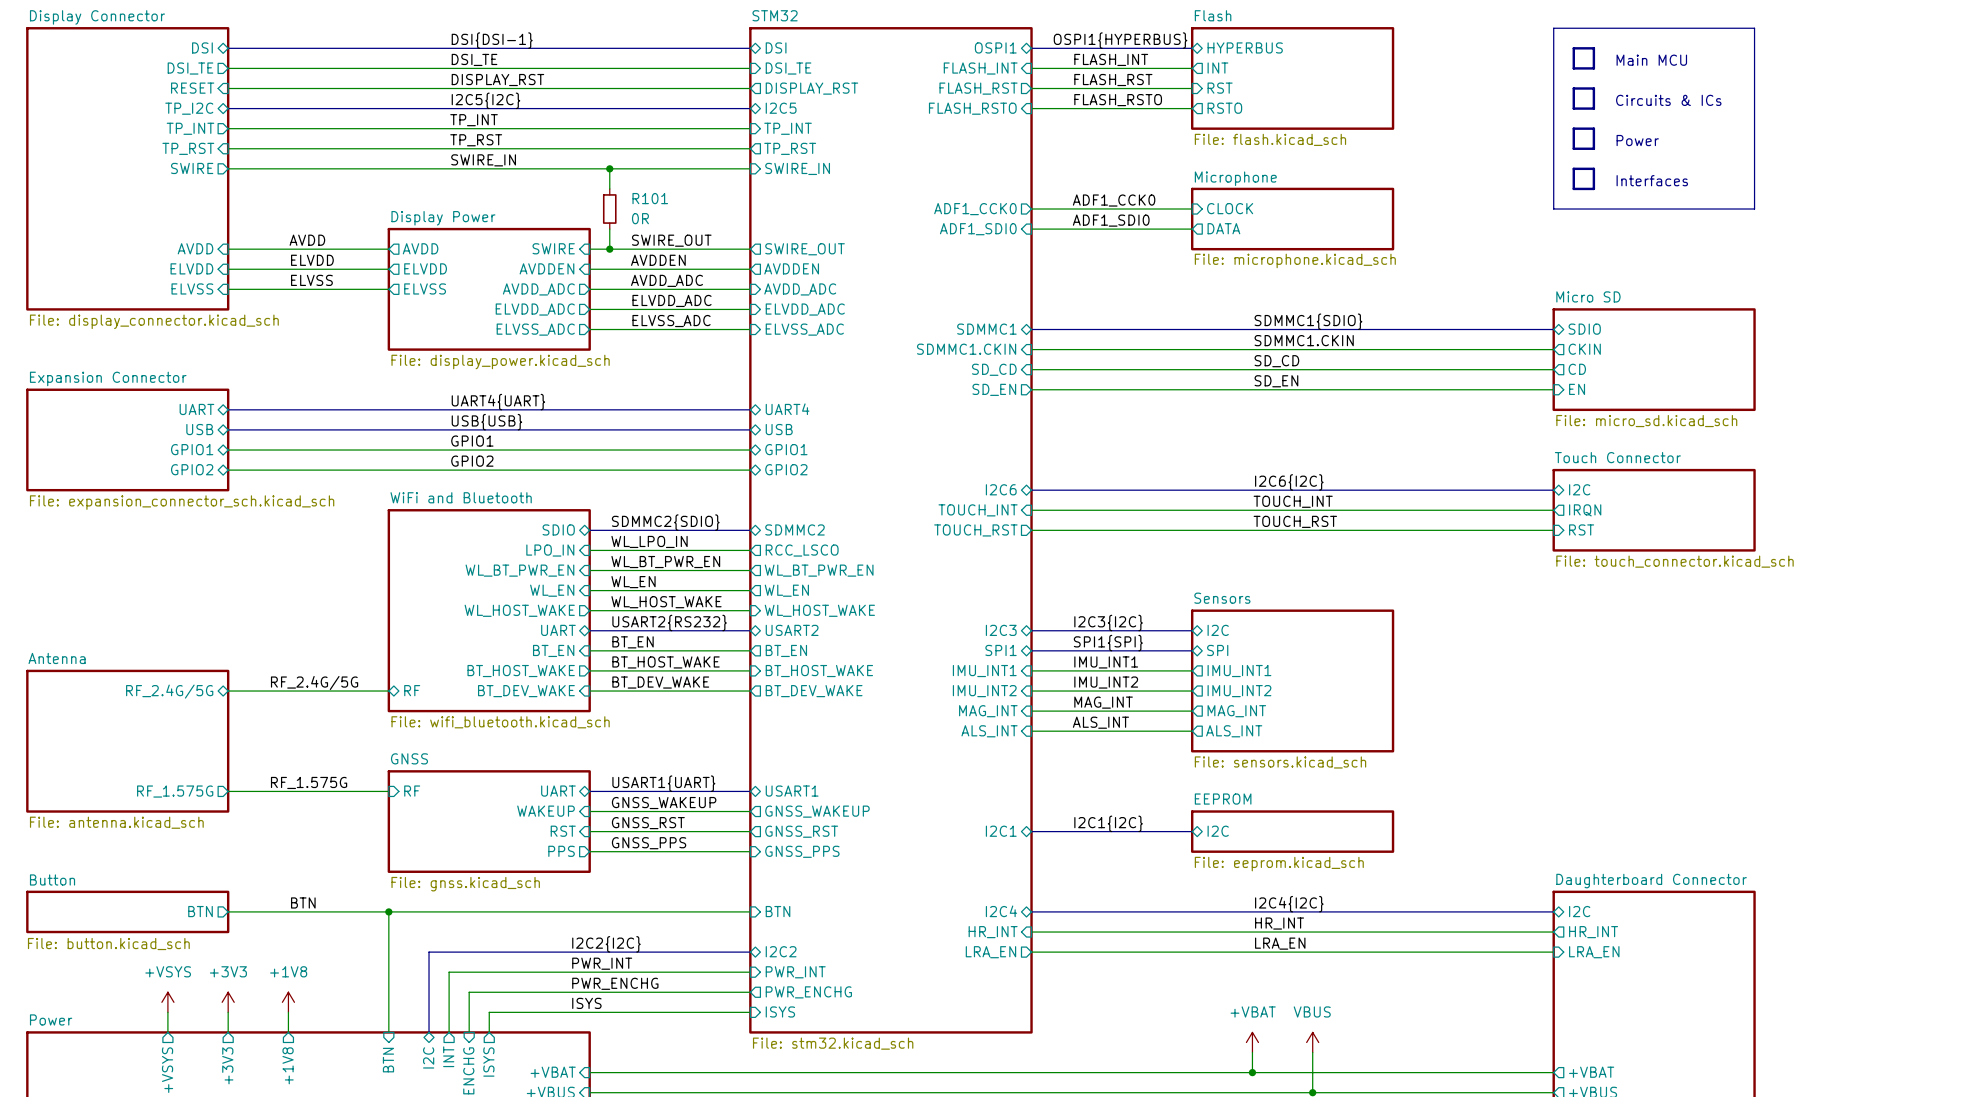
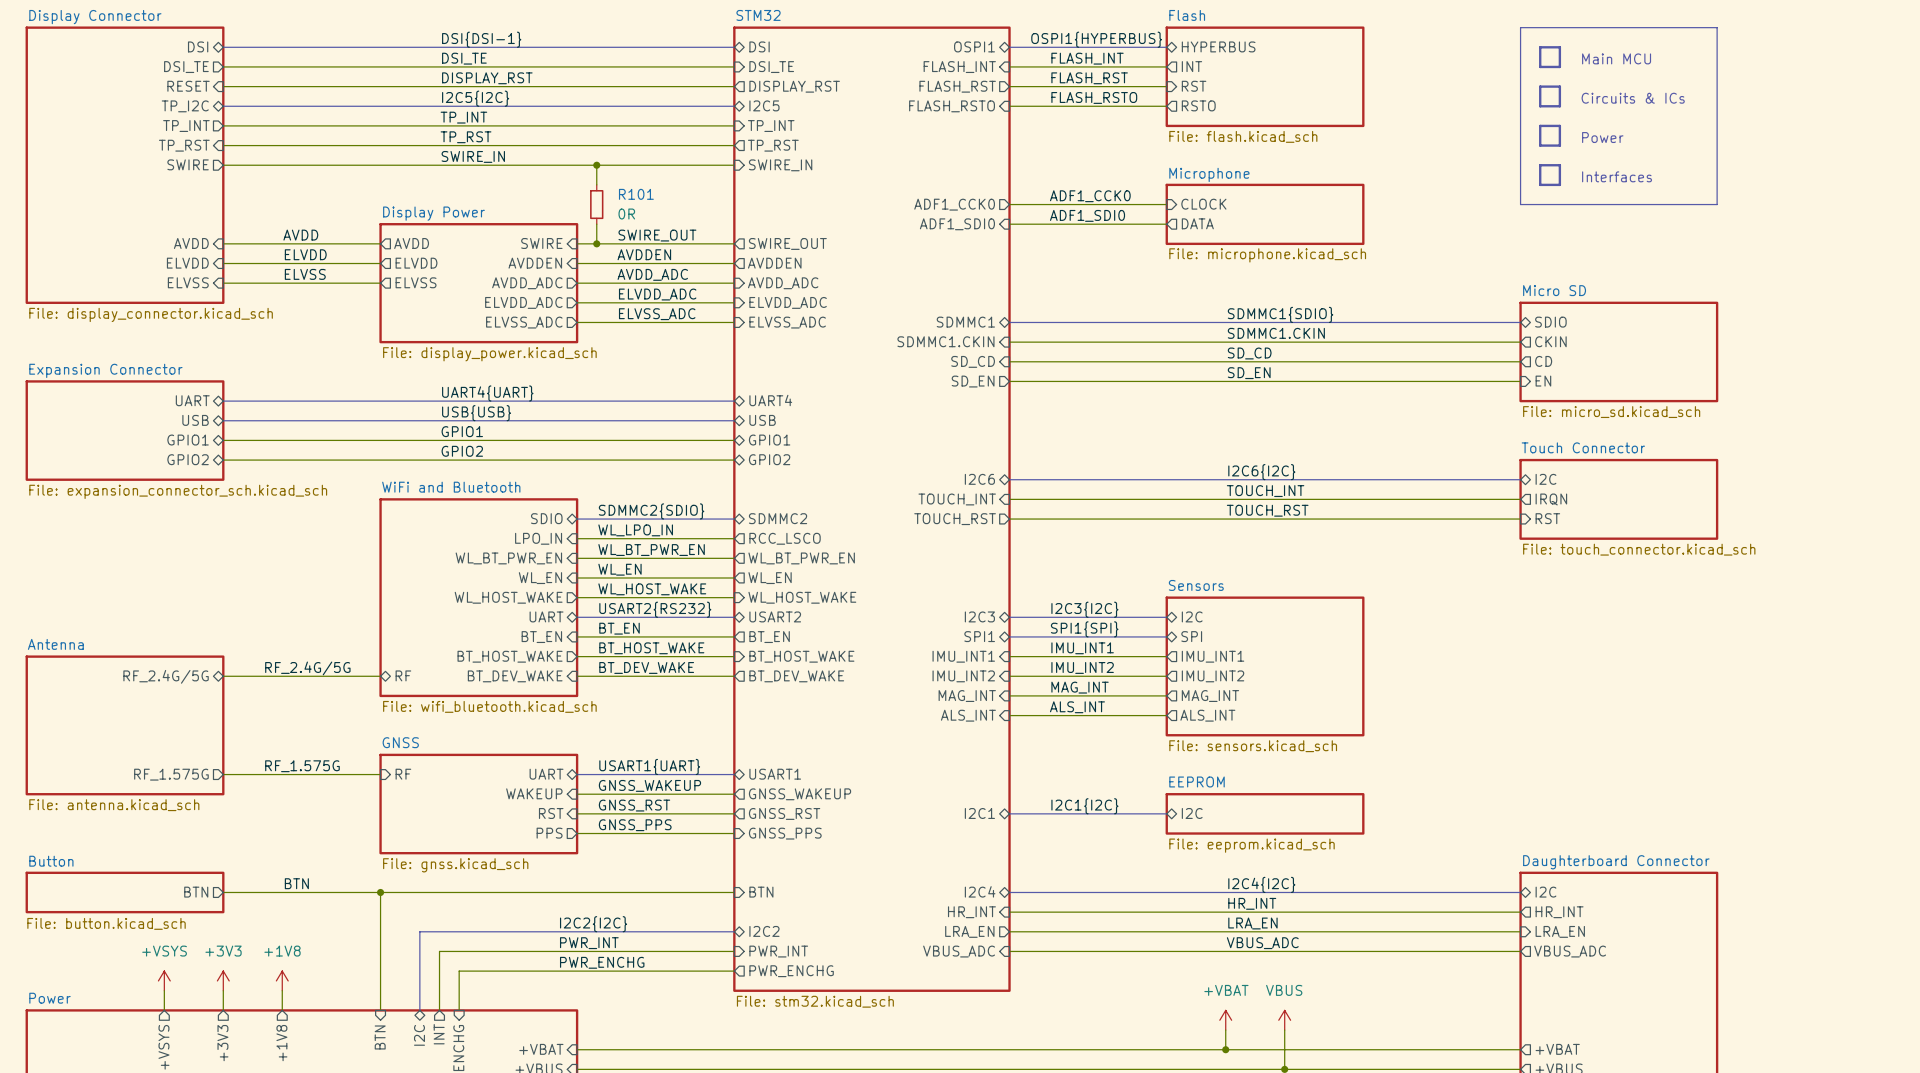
sheet STM32 shape: [749, 27, 1033, 1034] -> [733, 26, 1011, 992]
label: none -> VBUS_ADC (1262, 943)
sheet pin: none -> VBUS_ADC (959, 951)
wire: none -> (1009, 951) (1520, 951)
sheet pin: none -> VBUS_ADC (1570, 951)
label: ISYS (586, 1003) -> none
sheet pin: ISYS (780, 1011) -> none
wire: (750, 1012) (489, 1012) (489, 1032) -> none
sheet pin: ISYS (488, 1062) -> none

